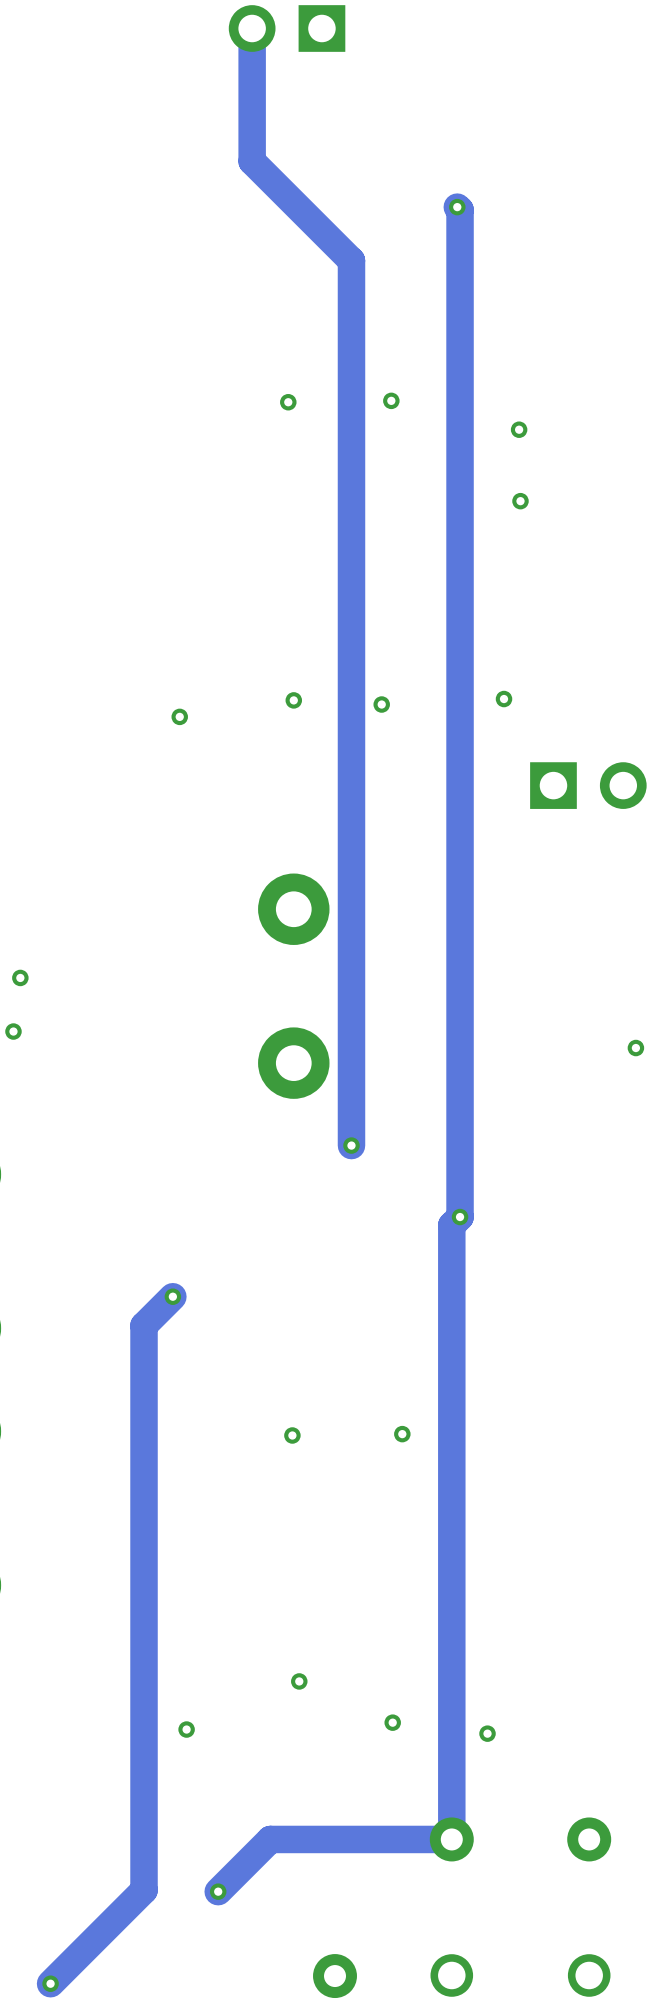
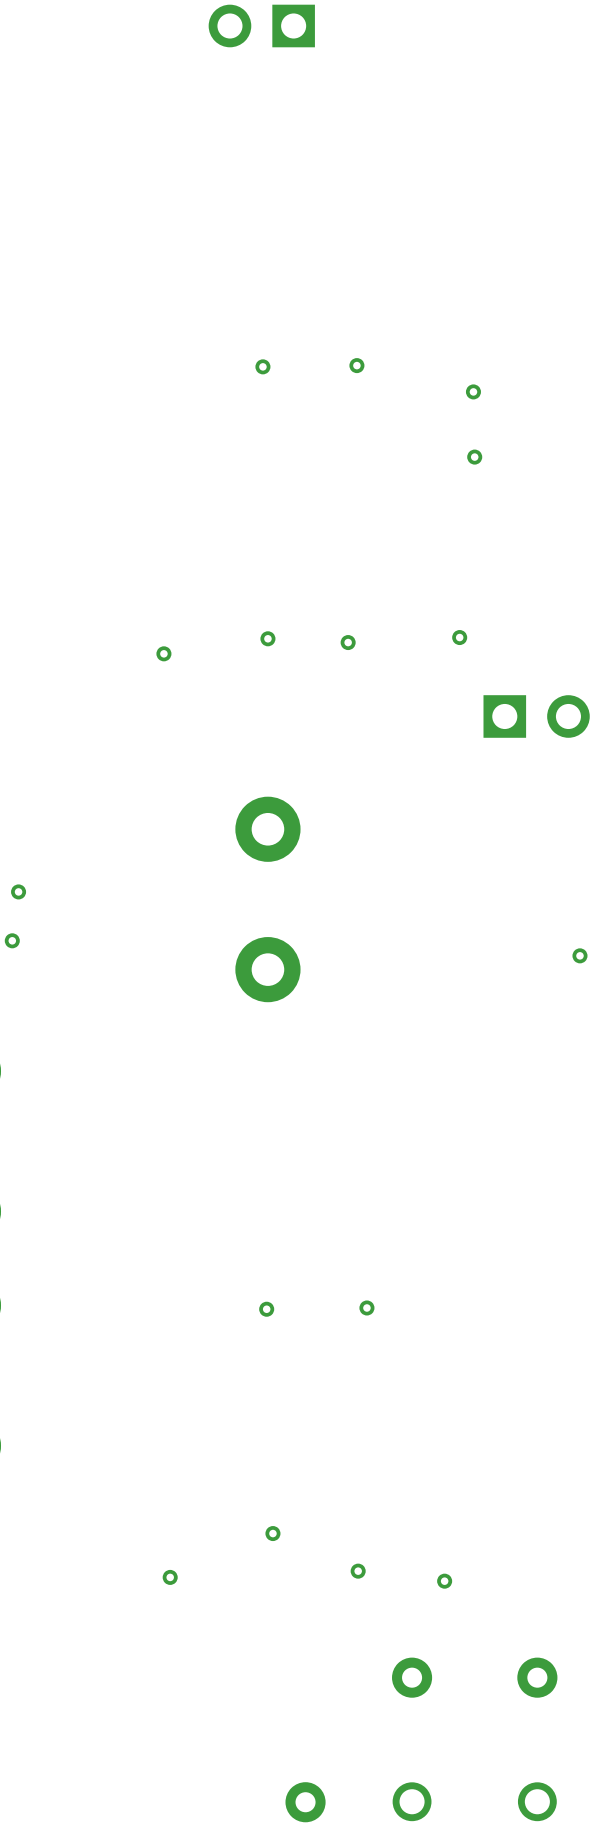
track: (252, 28) (252, 161) (351, 260) (351, 1145) -> none
track: (457, 207) (460, 209) (460, 1217) (451, 1225) (451, 1839) (270, 1839) (218, 1891) -> none
via: (457, 207) -> none
via: (351, 1145) -> none
via: (460, 1217) -> none
track: (172, 1296) (144, 1325) (144, 1890) (50, 1983) -> none
via: (172, 1296) -> none
via: (218, 1891) -> none
via: (50, 1983) -> none

